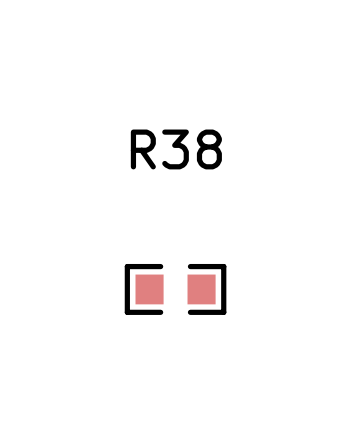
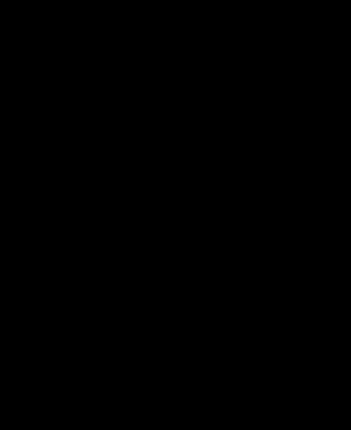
R38: (175, 289) -> none

